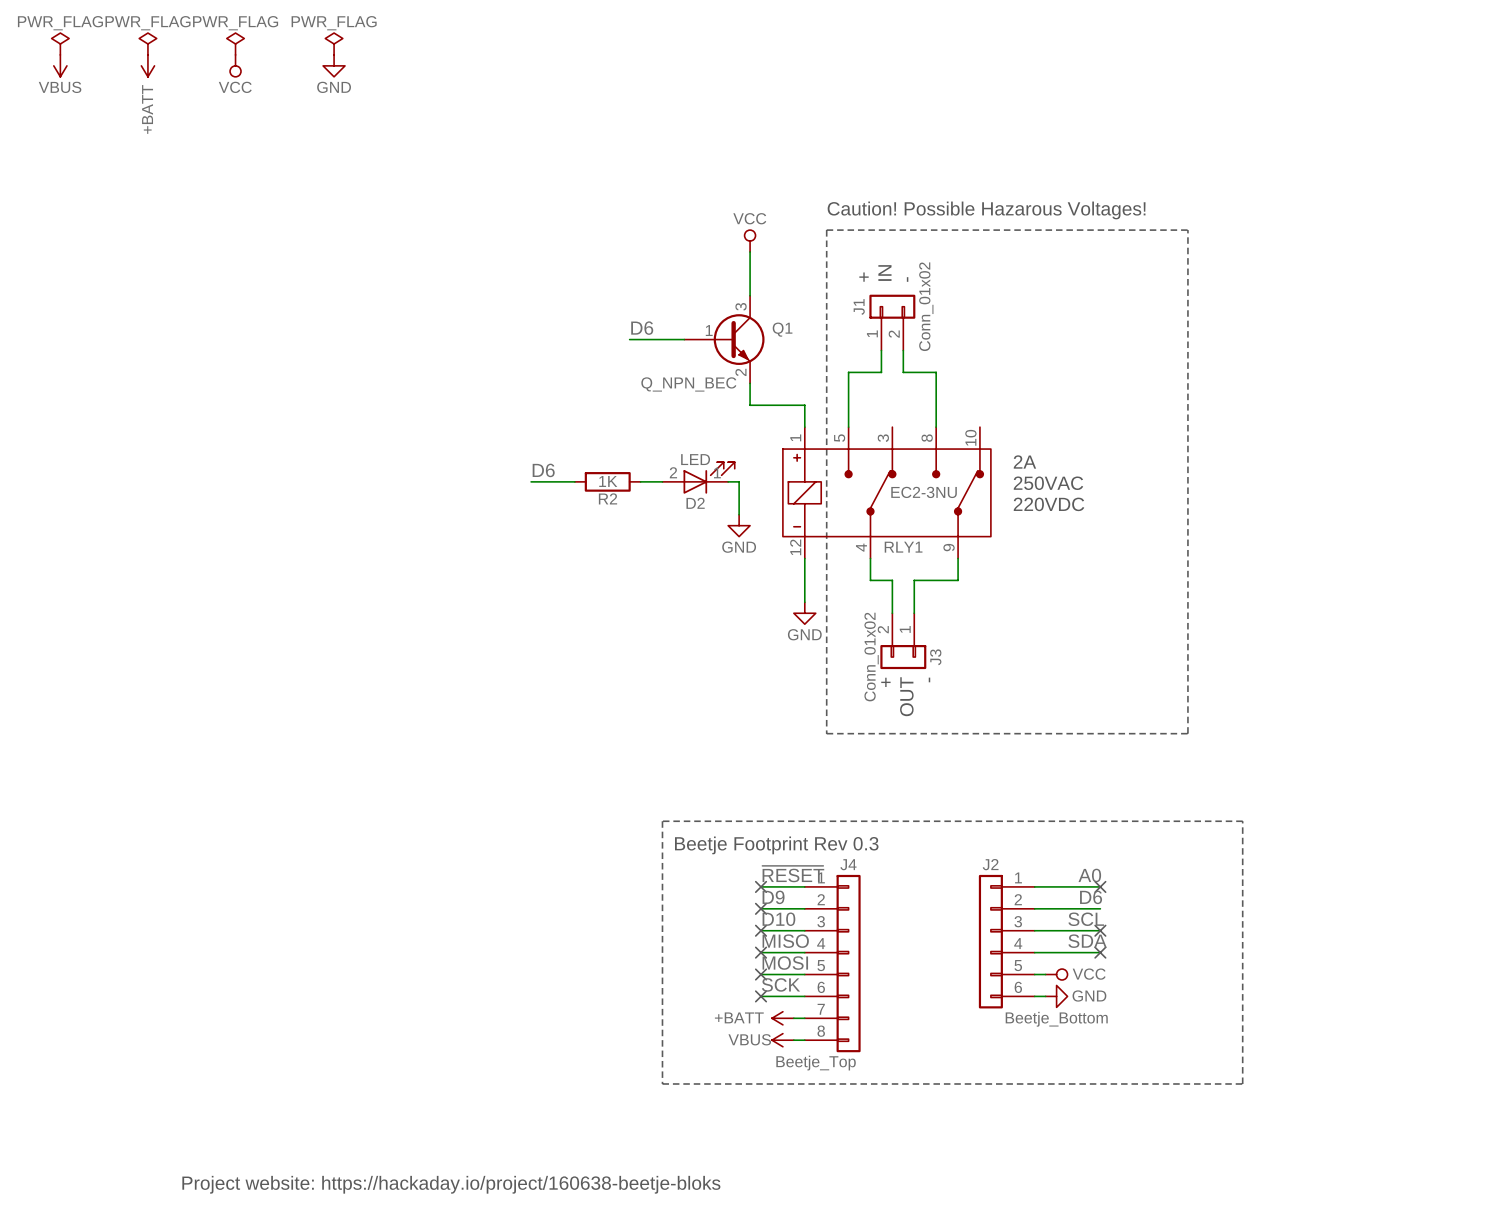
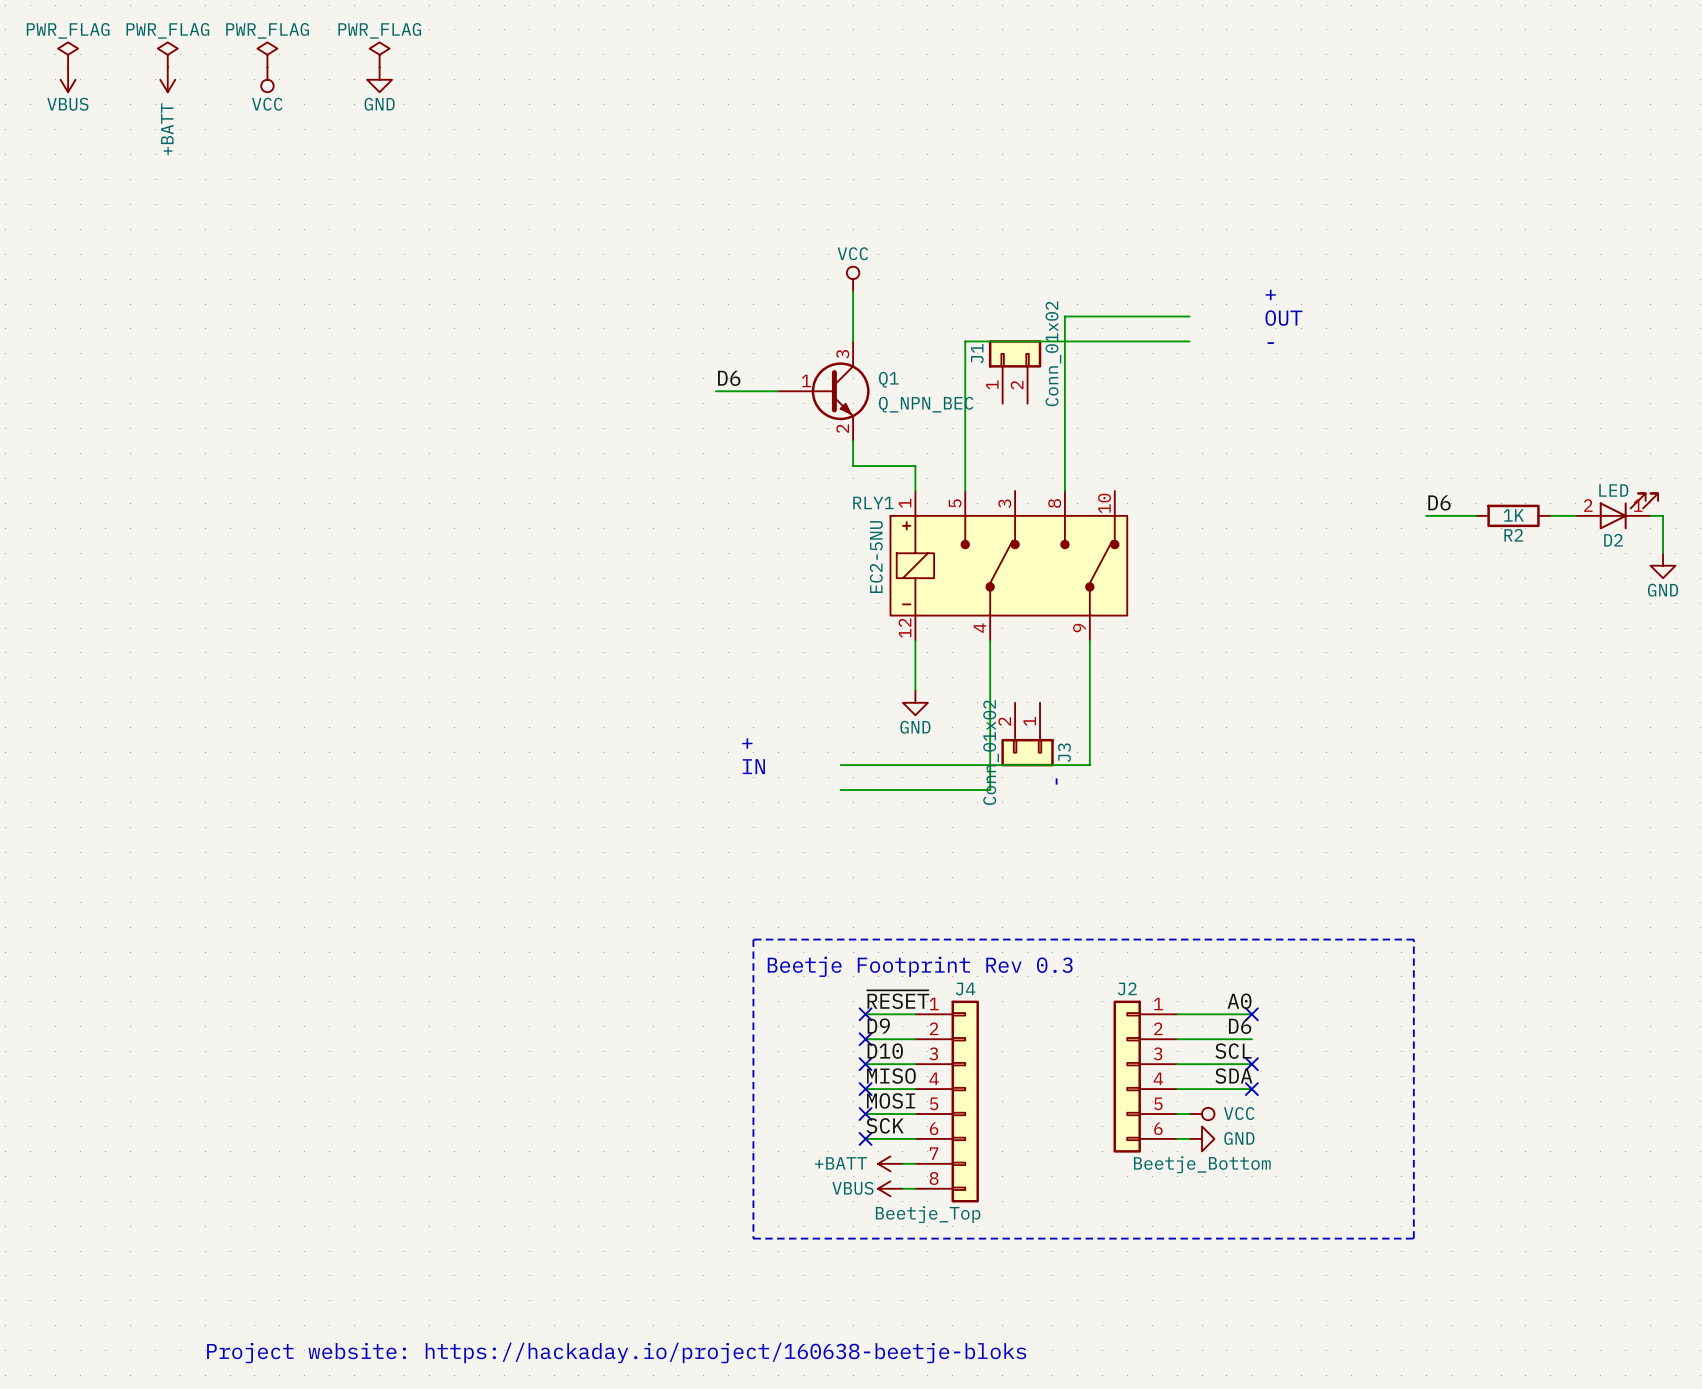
text: Caution! Possible Hazarous Voltages! (986, 210) -> none
line: (826, 230) (1187, 230) (1187, 733) (826, 733) (826, 230) -> none
text: none -> + (1270, 294)
text: IN (884, 273) -> none
text: none -> OUT (1283, 318)
text: + (864, 277) -> none
text rotation: 0° (907, 279) -> 90° clockwise (1270, 343)
text position: - (907, 279) -> - (1270, 343)
wire: (881, 350) (881, 372) (848, 372) -> (1189, 341) (965, 341) (965, 428)
wire: (903, 350) (903, 372) (936, 372) -> (1189, 316) (1064, 316) (1064, 428)
Q1 value position: Q_NPN_BEC (688, 384) -> Q_NPN_BEC (926, 404)
label: none -> D6 (1439, 502)
wire: none -> (1426, 515) (1476, 515)
wire: none -> (1550, 515) (1575, 515)
wire: none -> (1650, 515) (1663, 515) (1663, 553)
text: 2A (1024, 462) -> none
label: D6 (543, 470) -> none
D2 position: (698, 477) -> (1616, 511)
wire: (531, 481) (574, 481) -> none
R2 position: (607, 481) -> (1513, 515)
wire: (640, 481) (662, 481) -> none
wire: (728, 481) (739, 481) (739, 514) -> none
text: 250VAC (1048, 483) -> none
RLY1 value: EC2-3NU (924, 492) -> EC2-5NU (876, 557)
power symbol: none -> GND (1663, 565)
text: 220VDC (1049, 504) -> none
power symbol: GND (739, 525) -> none
RLY1 name position: RLY1 (903, 547) -> RLY1 (873, 502)
wire: (870, 580) (892, 580) (892, 613) -> (990, 665) (990, 790) (840, 790)
wire: (958, 580) (914, 580) (914, 613) -> (1089, 665) (1089, 765) (840, 765)
text: none -> + (747, 743)
text: none -> IN (753, 766)
text: + (885, 682) -> none
text: OUT (906, 696) -> none

